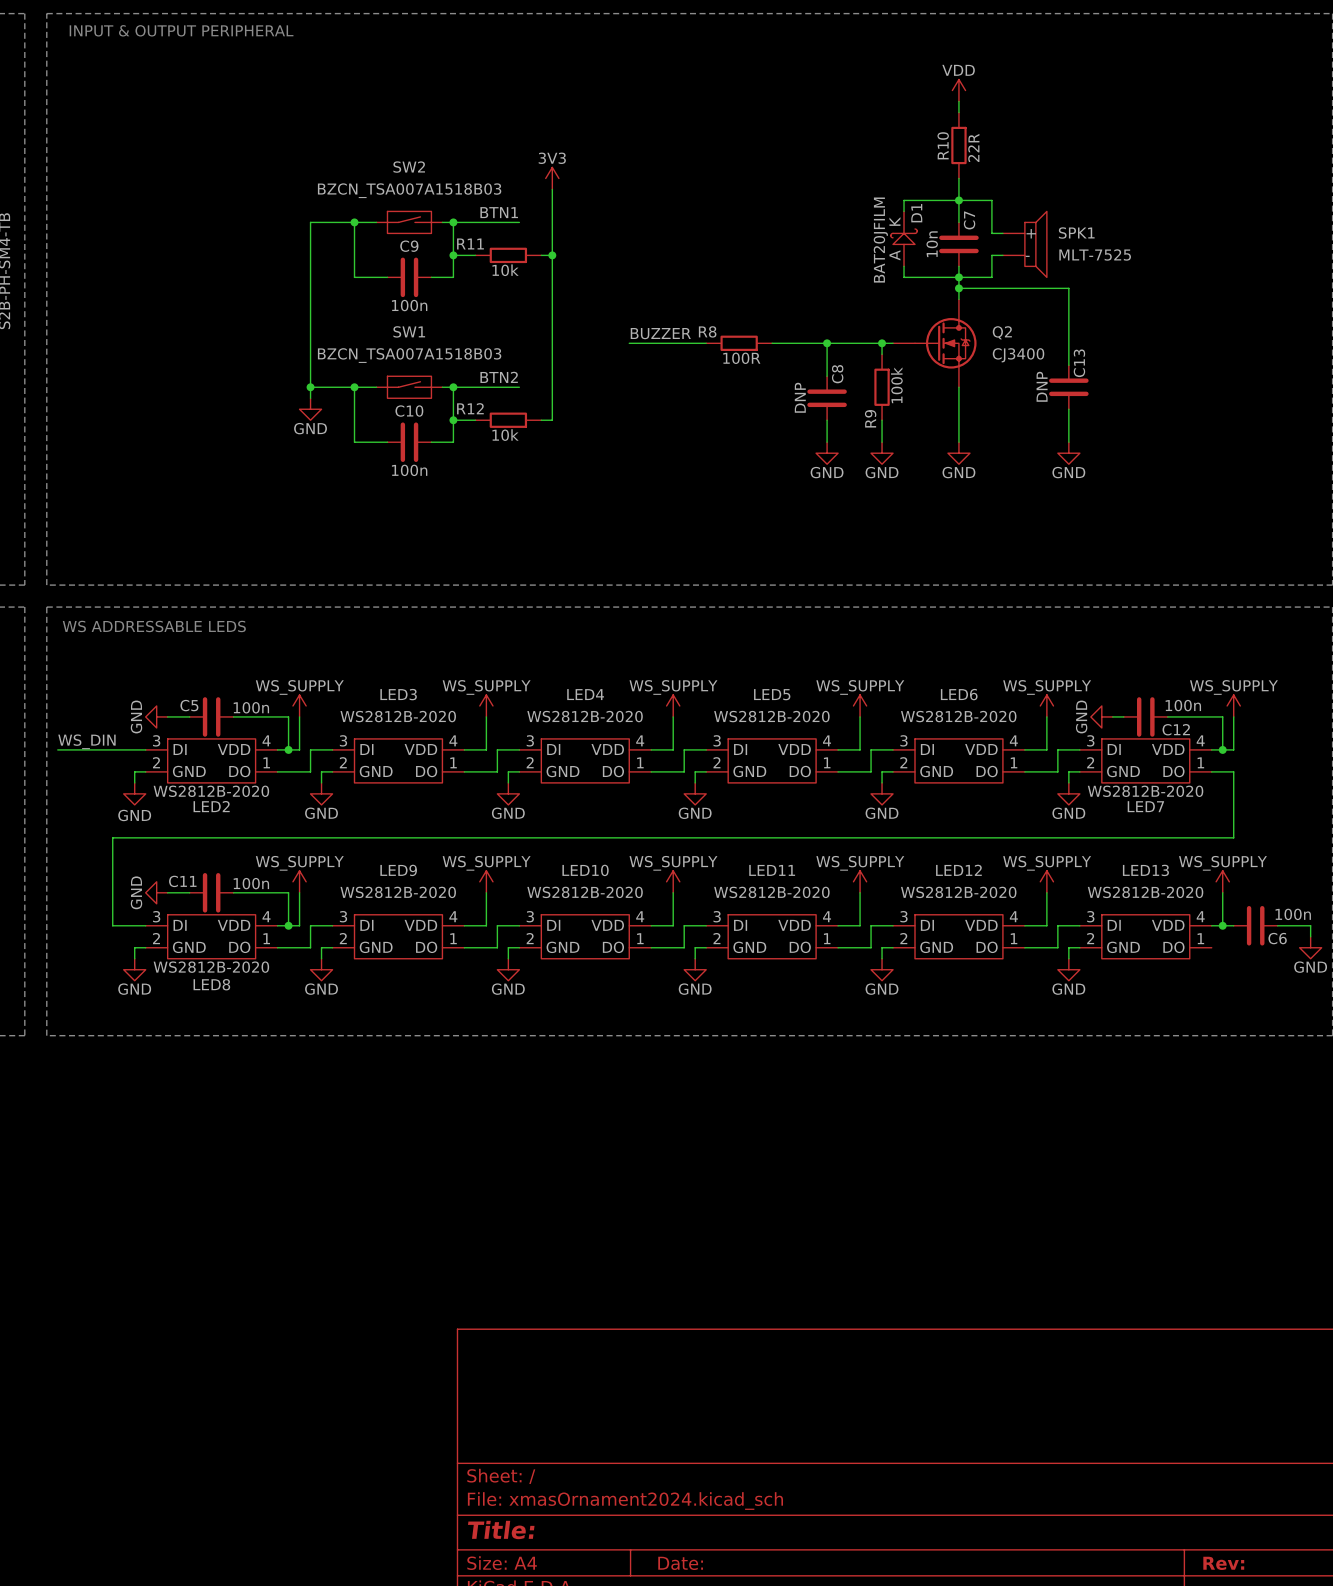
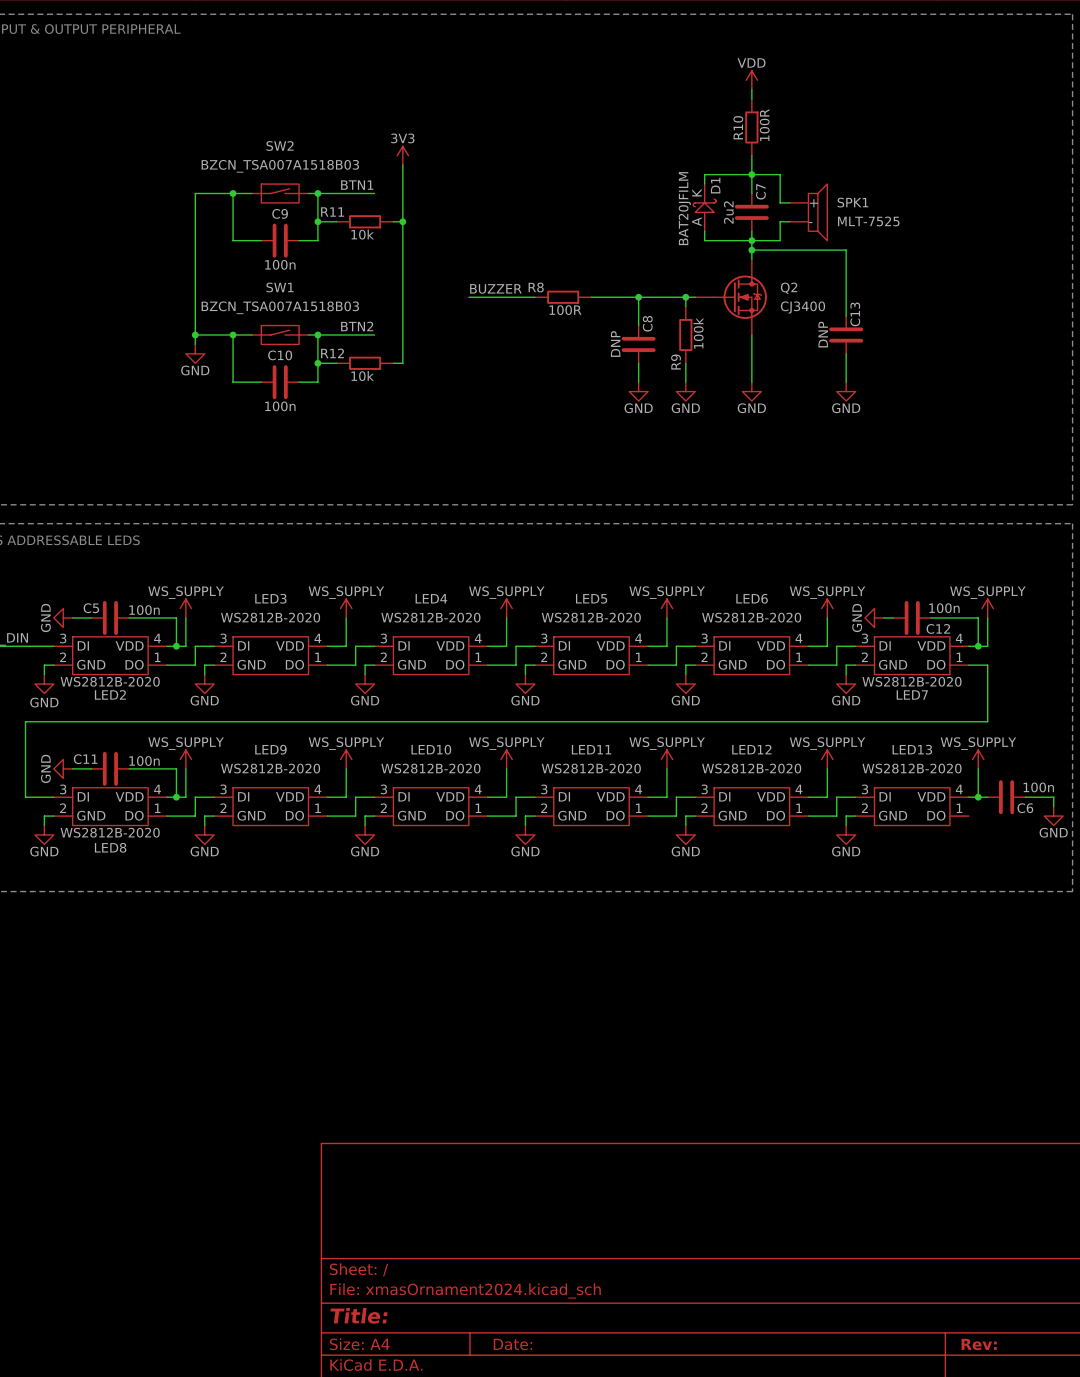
R10 value: 22R (973, 147) -> 100R (764, 125)
C7 value: 10n (932, 244) -> 2u2 (728, 212)

